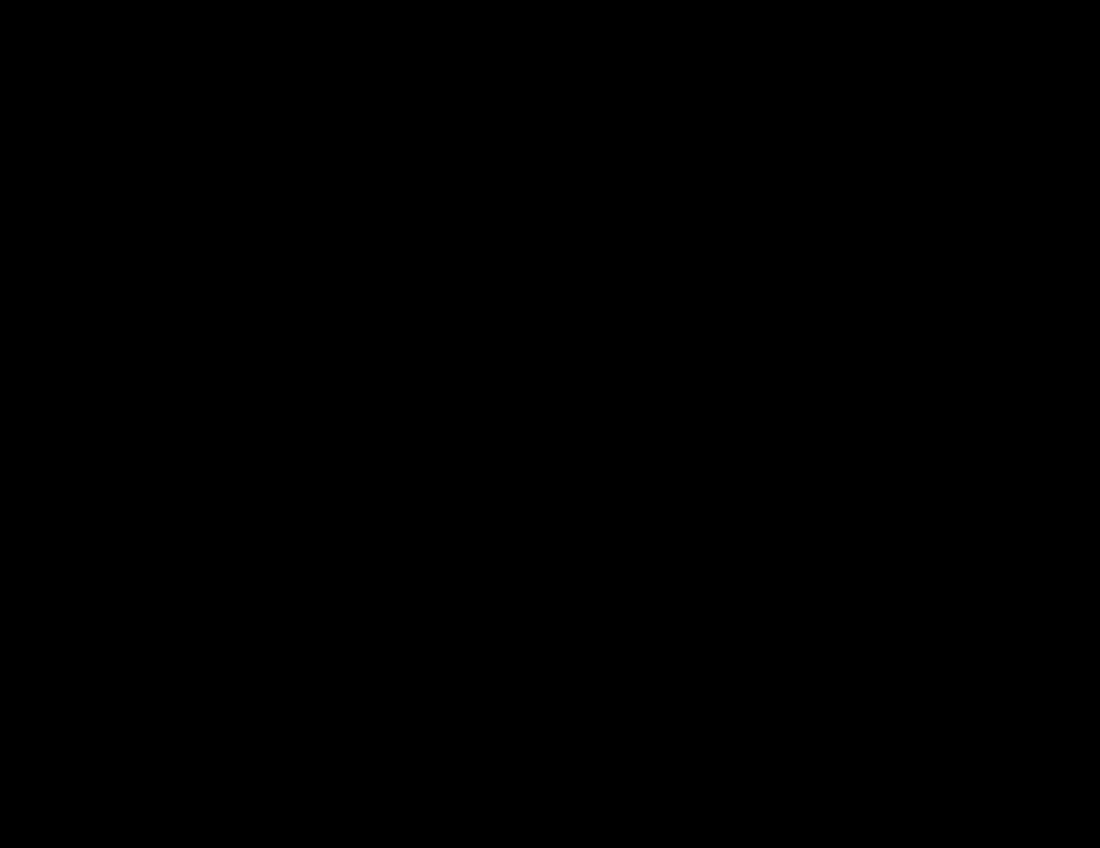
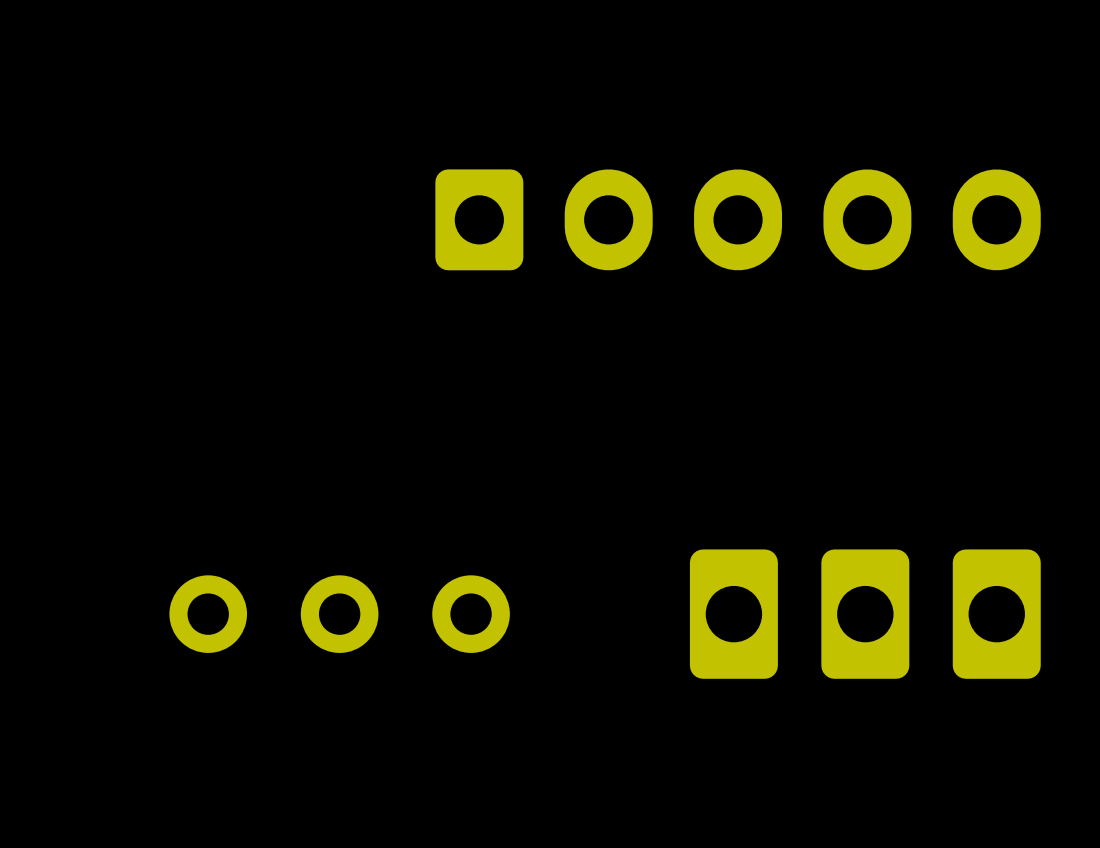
part: none -> (738, 219)
part: none -> (339, 614)
part: none -> (865, 614)

